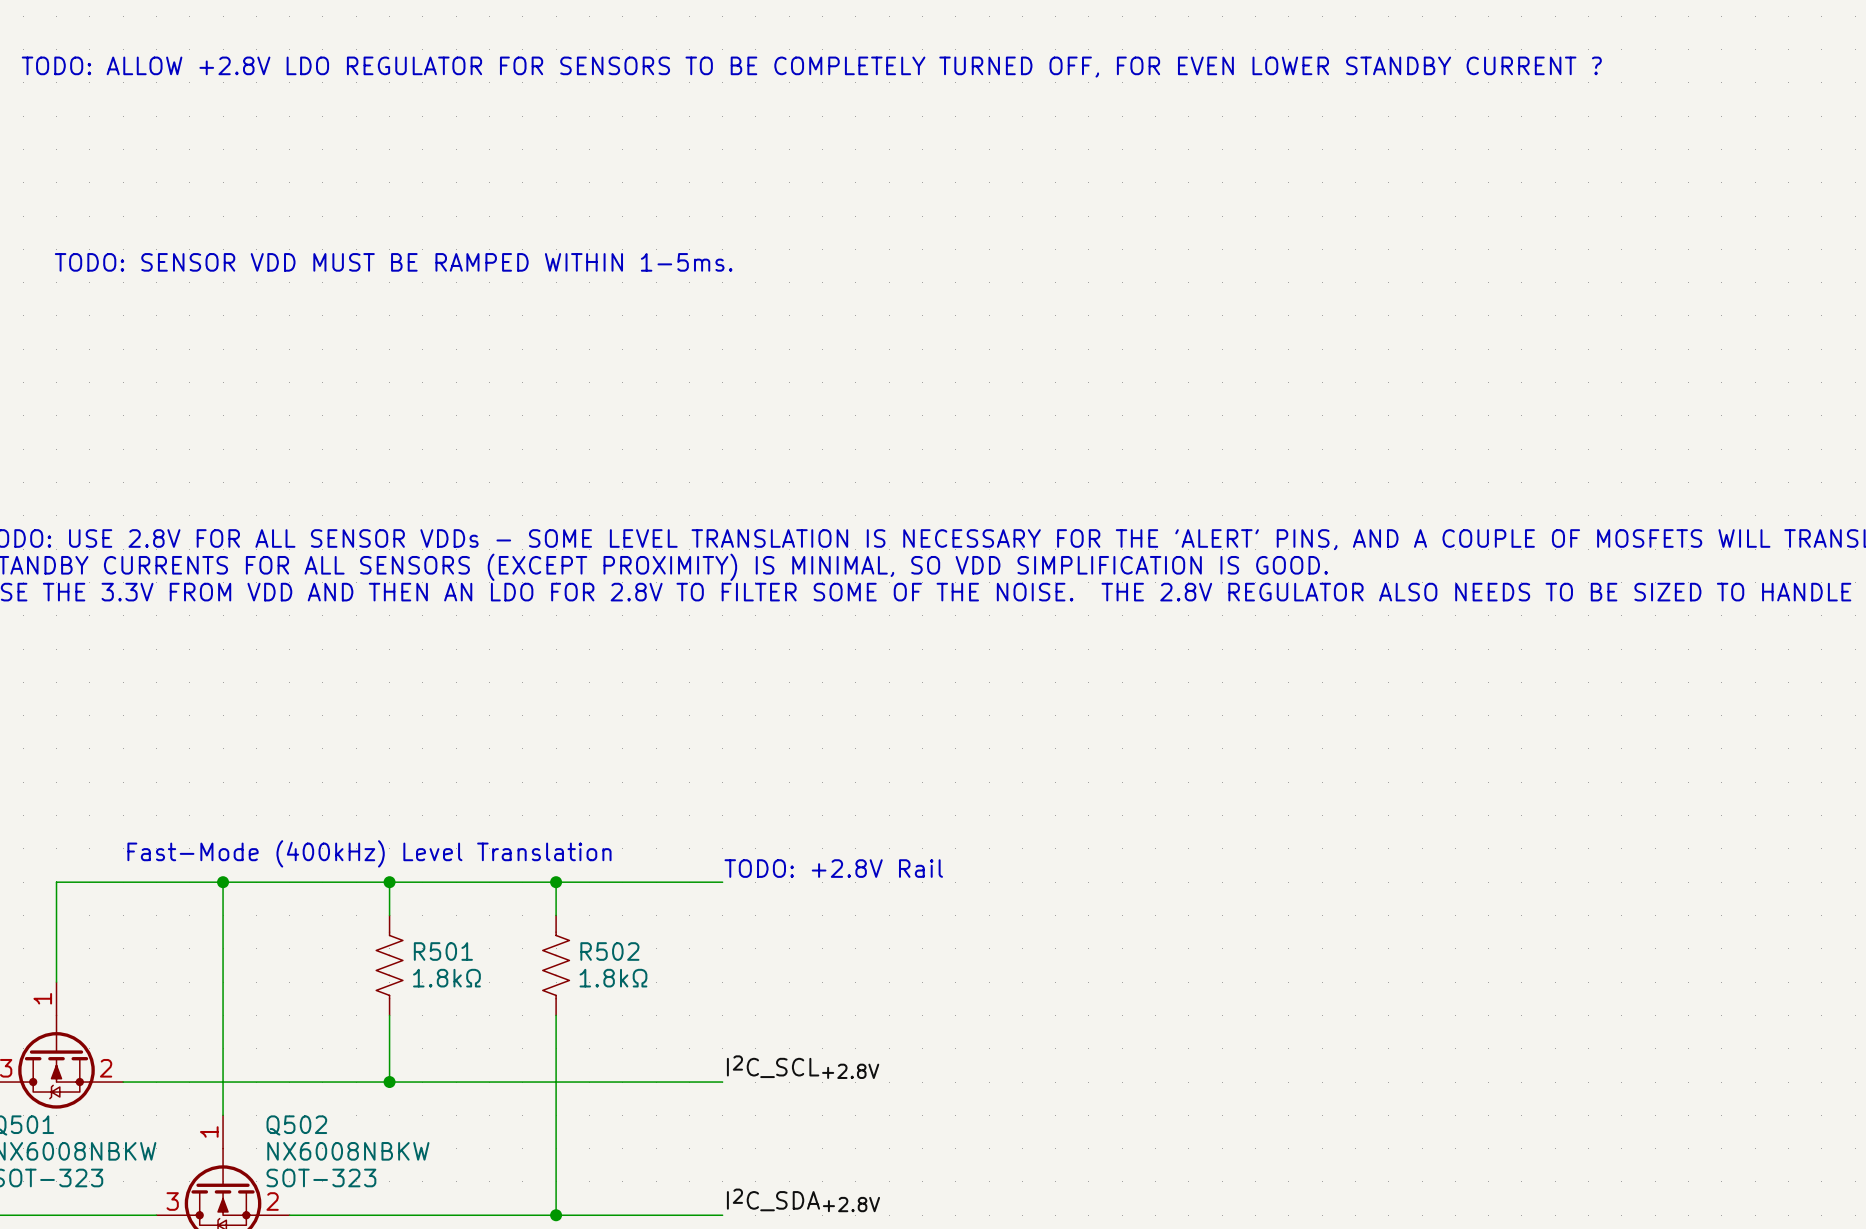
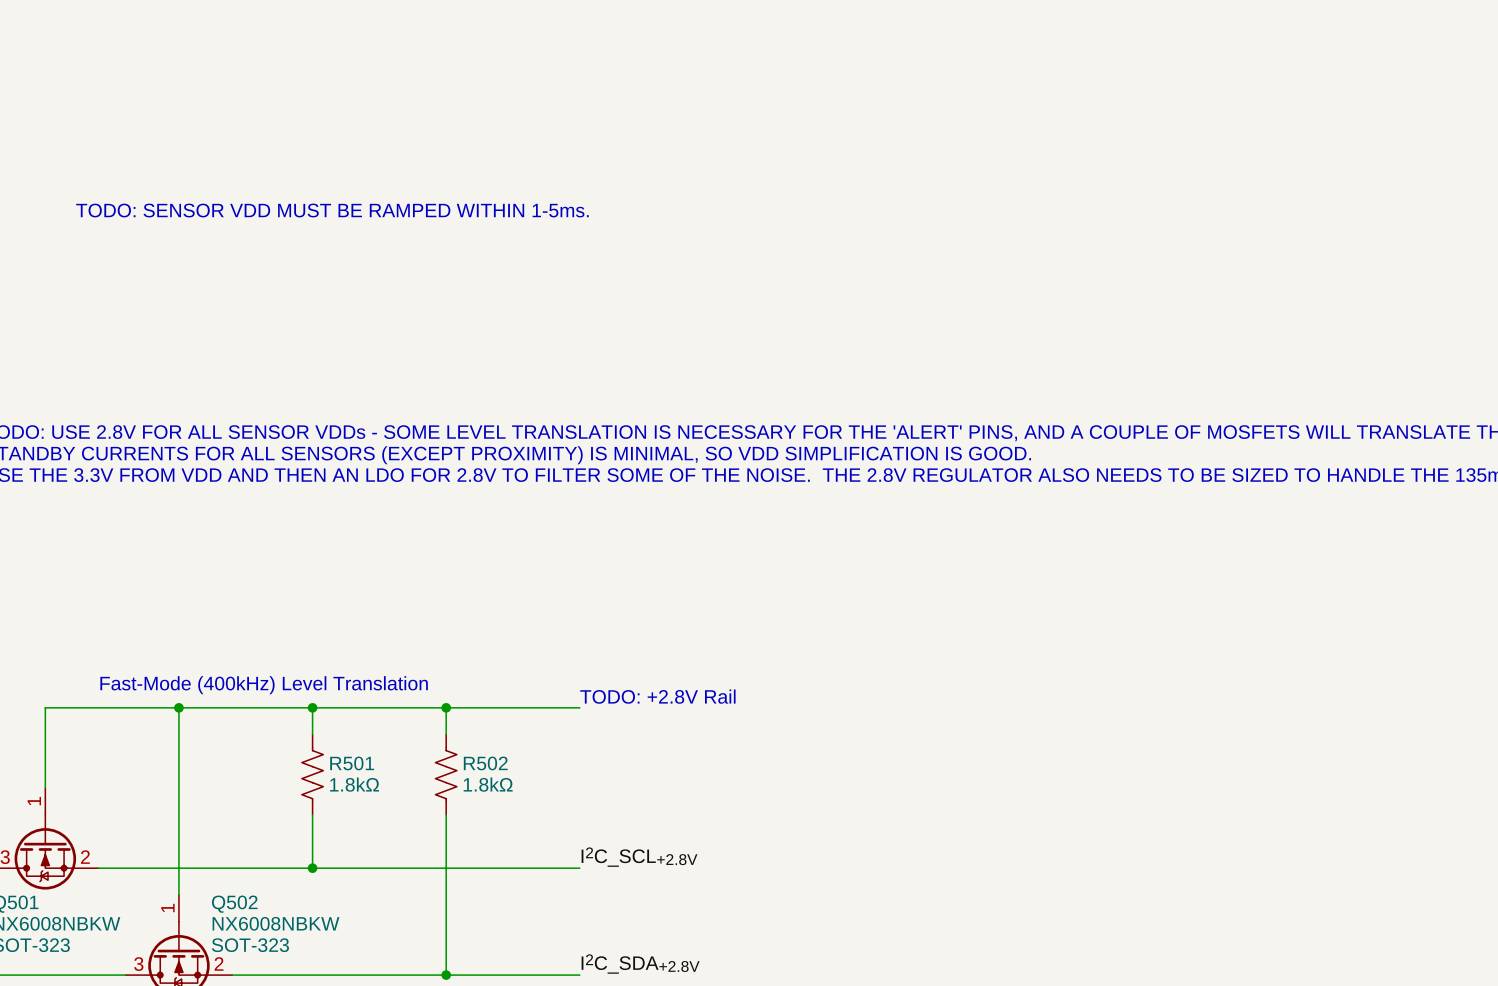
text: TODO: ALLOW +2.8V LDO REGULATOR FOR SENSORS TO BE COMPLETELY TURNED OFF, FOR EVEN LOWER STANDBY CURRENT ? (811, 67) -> none

